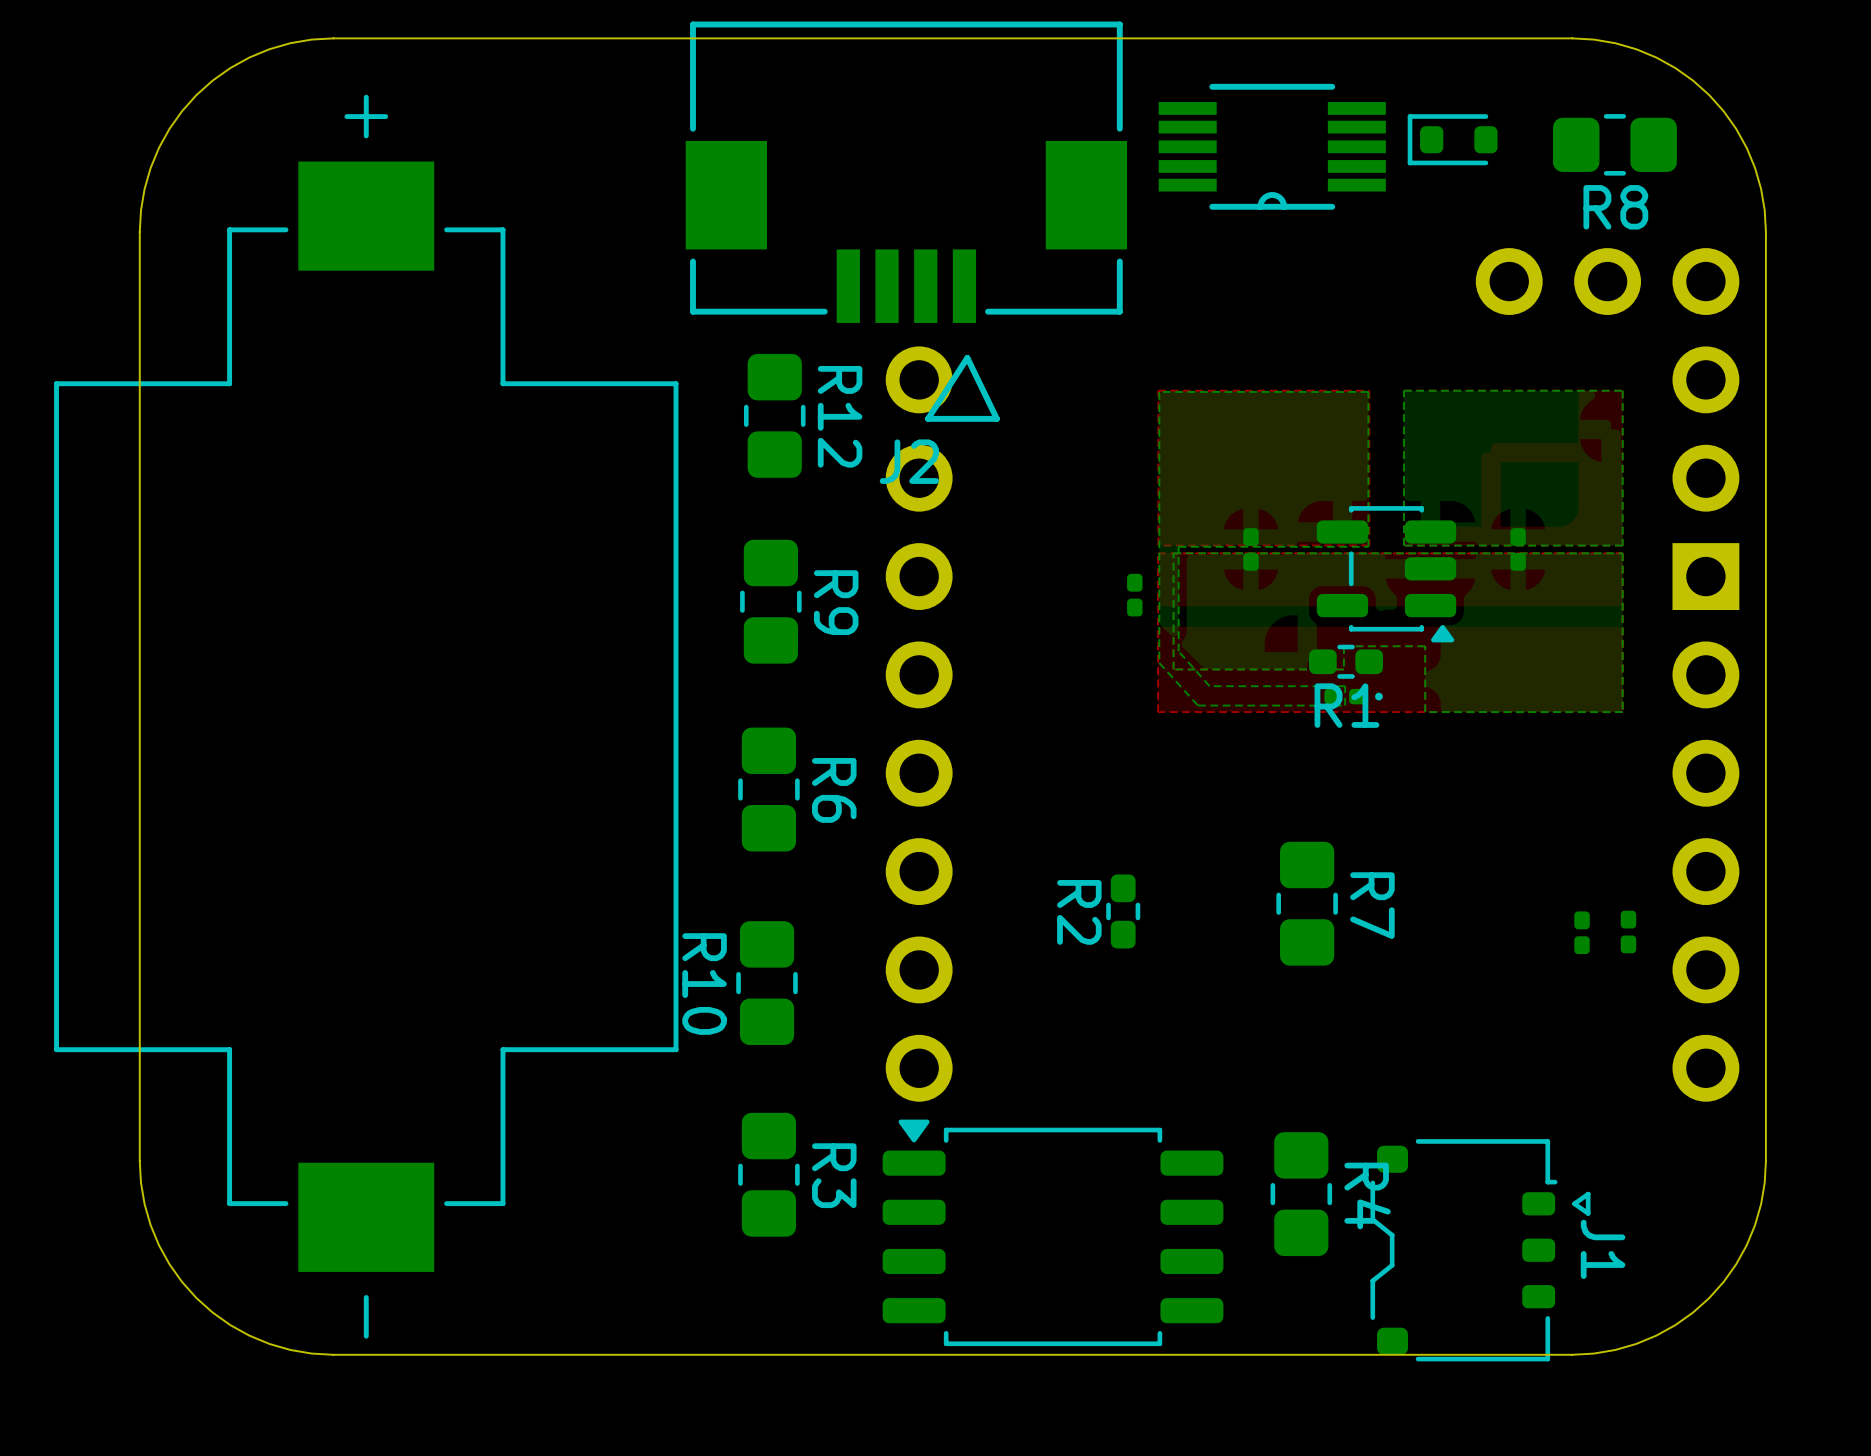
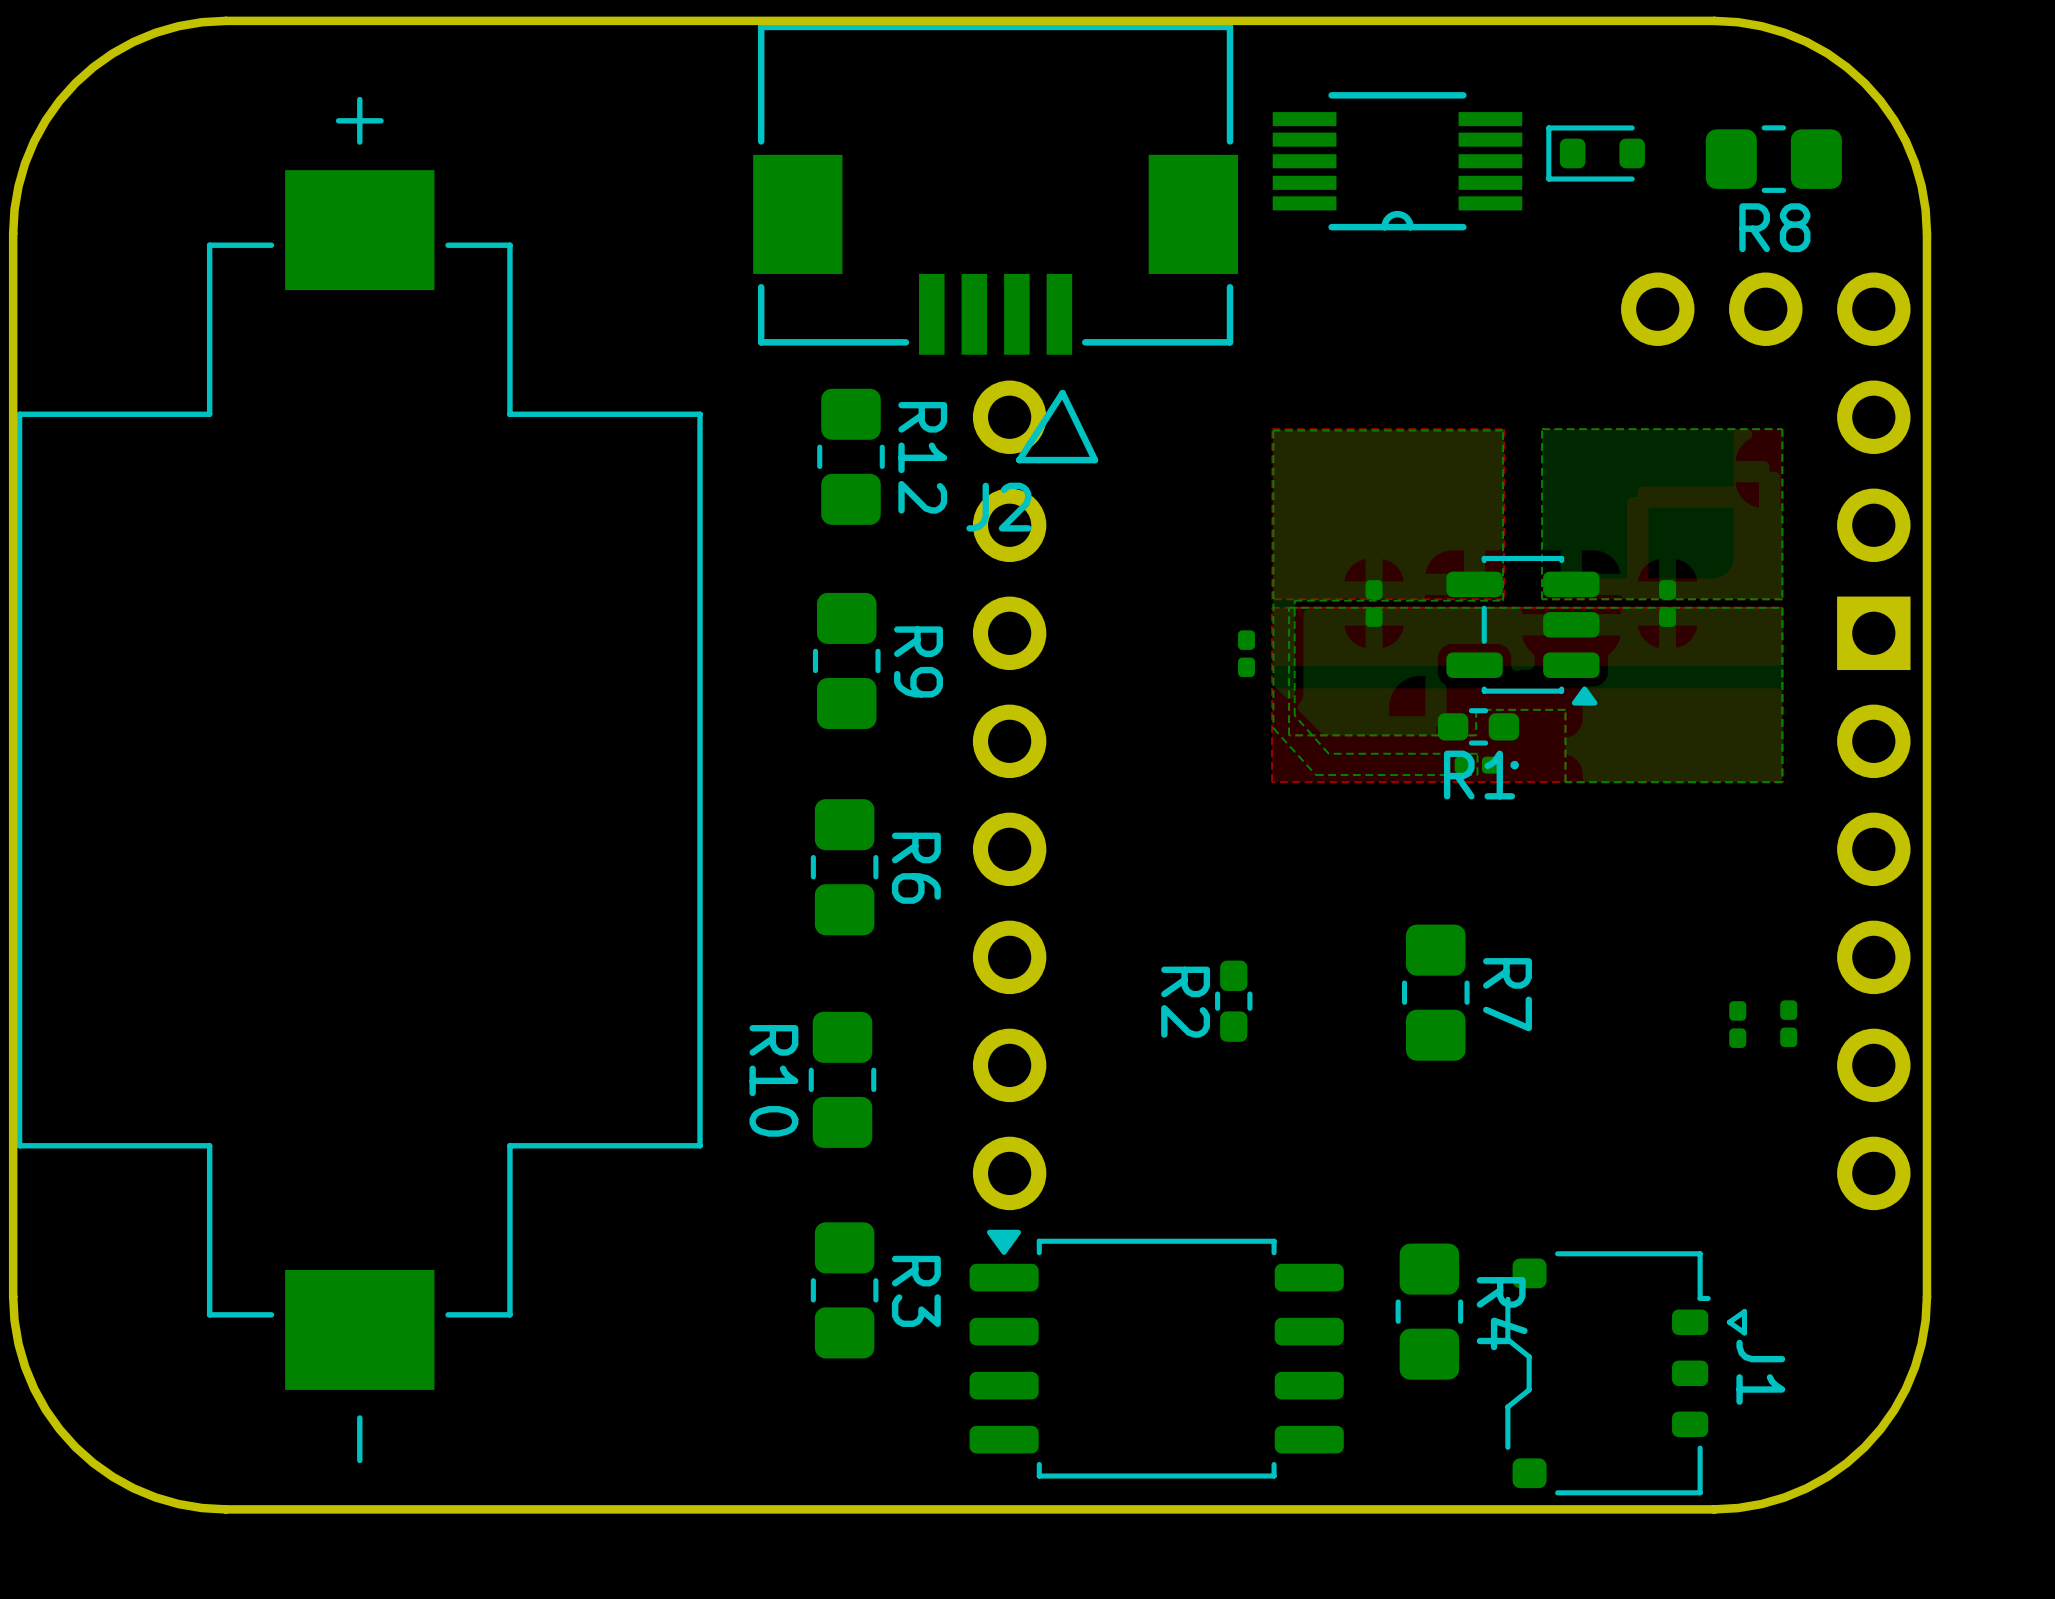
board edge: (1572, 38) (333, 38) (290, 43) (249, 57) (212, 80) (196, 95) (182, 111) (158, 147) (144, 188) (139, 231) (139, 1161) (144, 1204) (158, 1245) (182, 1281) (196, 1298) (230, 1325) (269, 1343) (311, 1353) (333, 1354) (1572, 1354) (1615, 1349) (1636, 1343) (1675, 1325) (1709, 1298) (1736, 1264) (1755, 1225) (1764, 1182) (1765, 1161) (1764, 210) (1755, 168) (1746, 147) (1723, 111) (1709, 95) (1675, 68) (1656, 57) (1615, 43) (1572, 38) -> (1714, 20) (1761, 26) (1806, 41) (1846, 67) (1864, 83) (1894, 120) (1905, 141) (1921, 186) (1925, 209) (1925, 1320) (1915, 1366) (1894, 1409) (1864, 1447) (1846, 1463) (1806, 1488) (1784, 1497) (1761, 1504) (1714, 1509) (225, 1509) (178, 1504) (133, 1488) (93, 1463) (59, 1429) (45, 1409) (25, 1366) (18, 1344) (13, 1296) (13, 233) (18, 186) (34, 141) (59, 100) (93, 67) (133, 41) (155, 32) (178, 26) (225, 20) (1714, 20)
part position: (366, 716) -> (359, 780)

